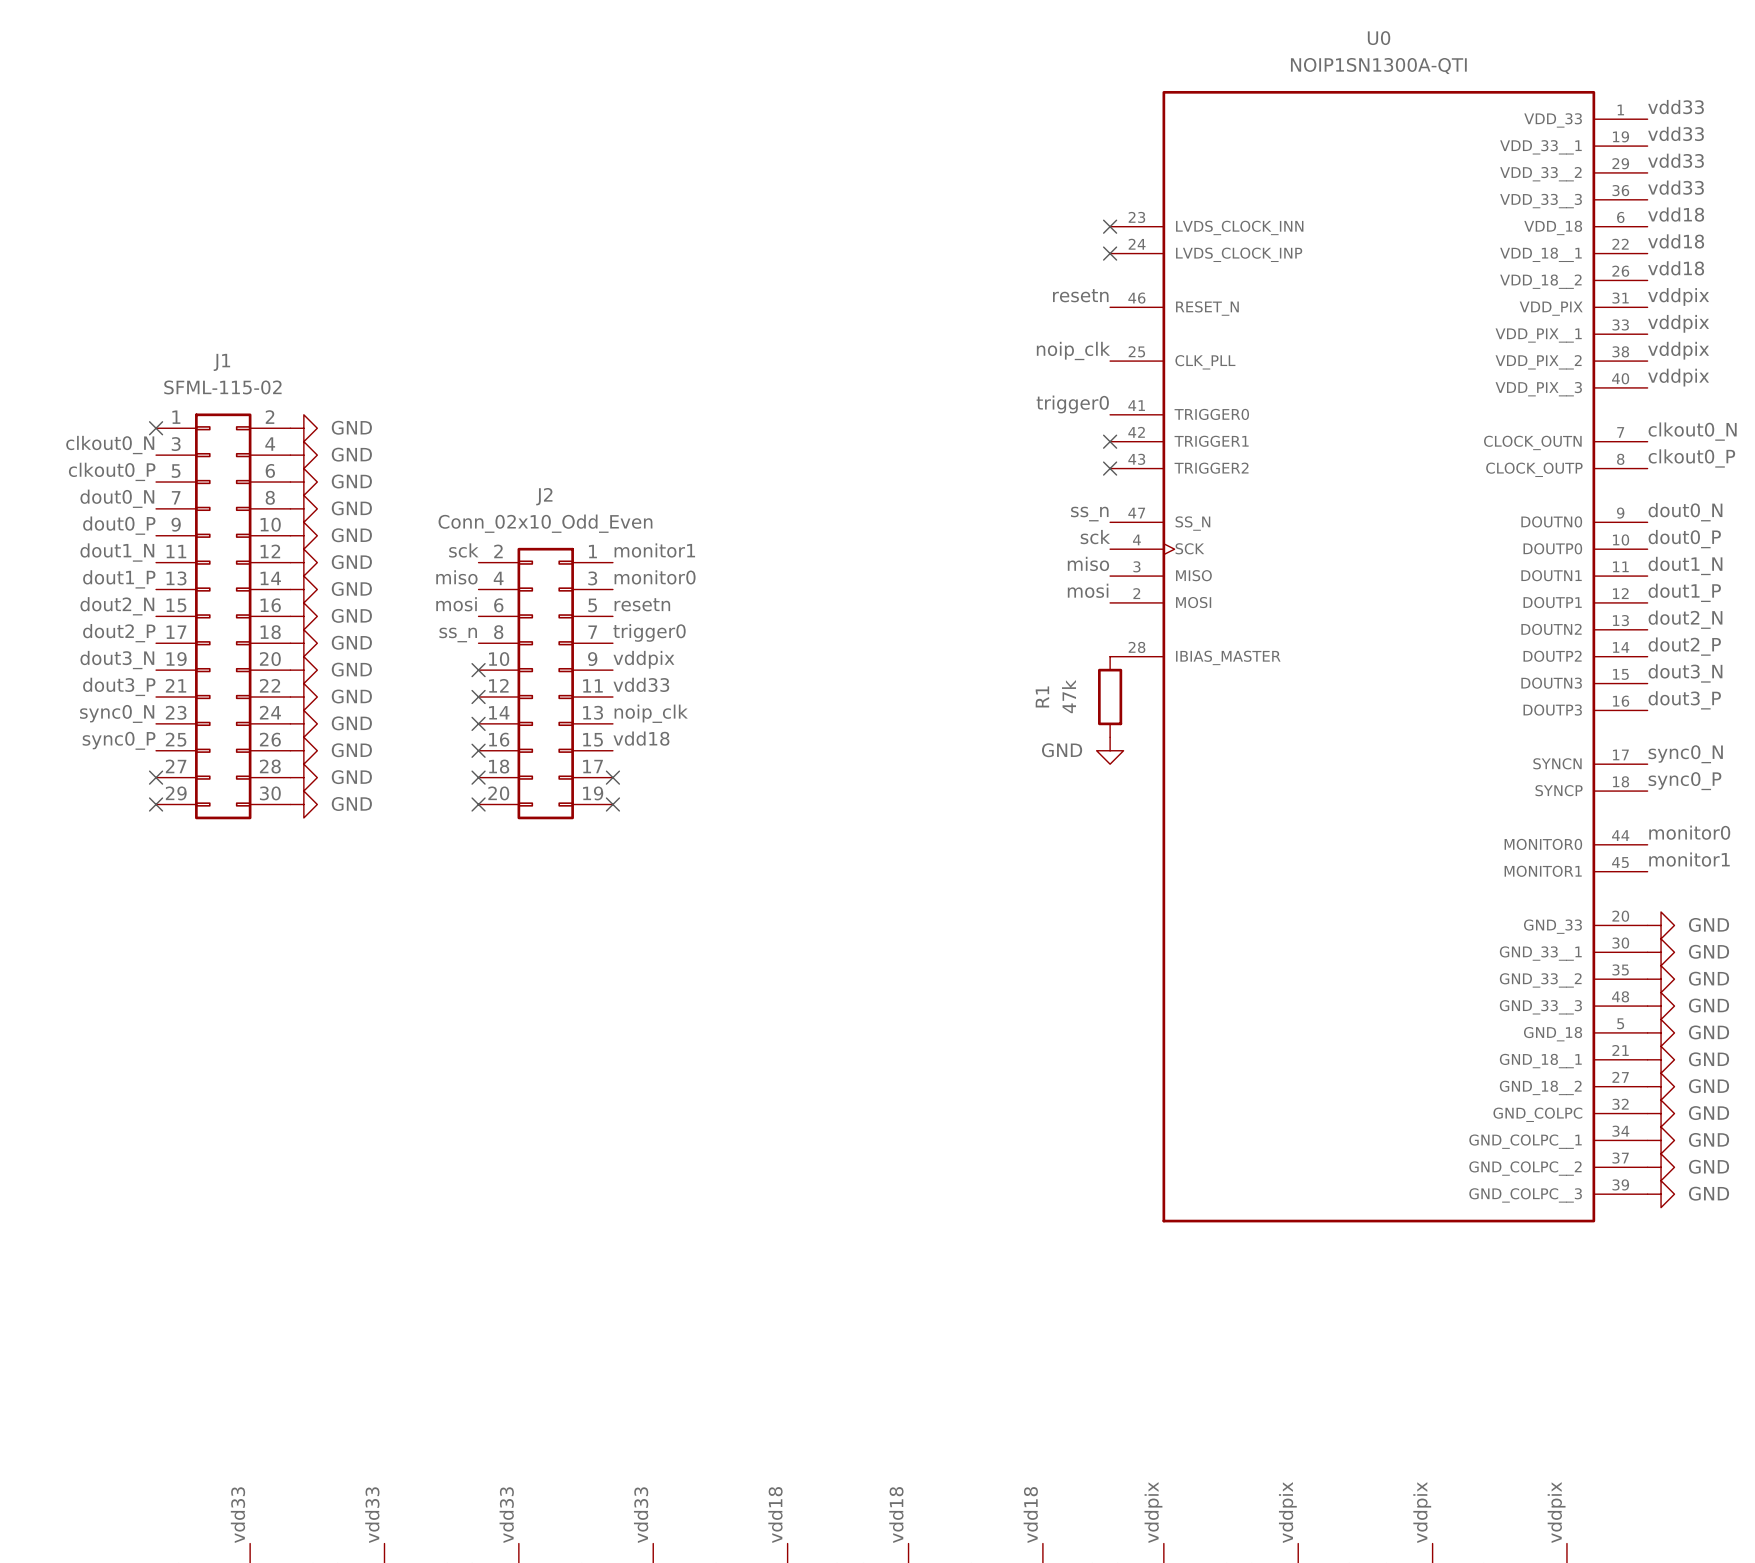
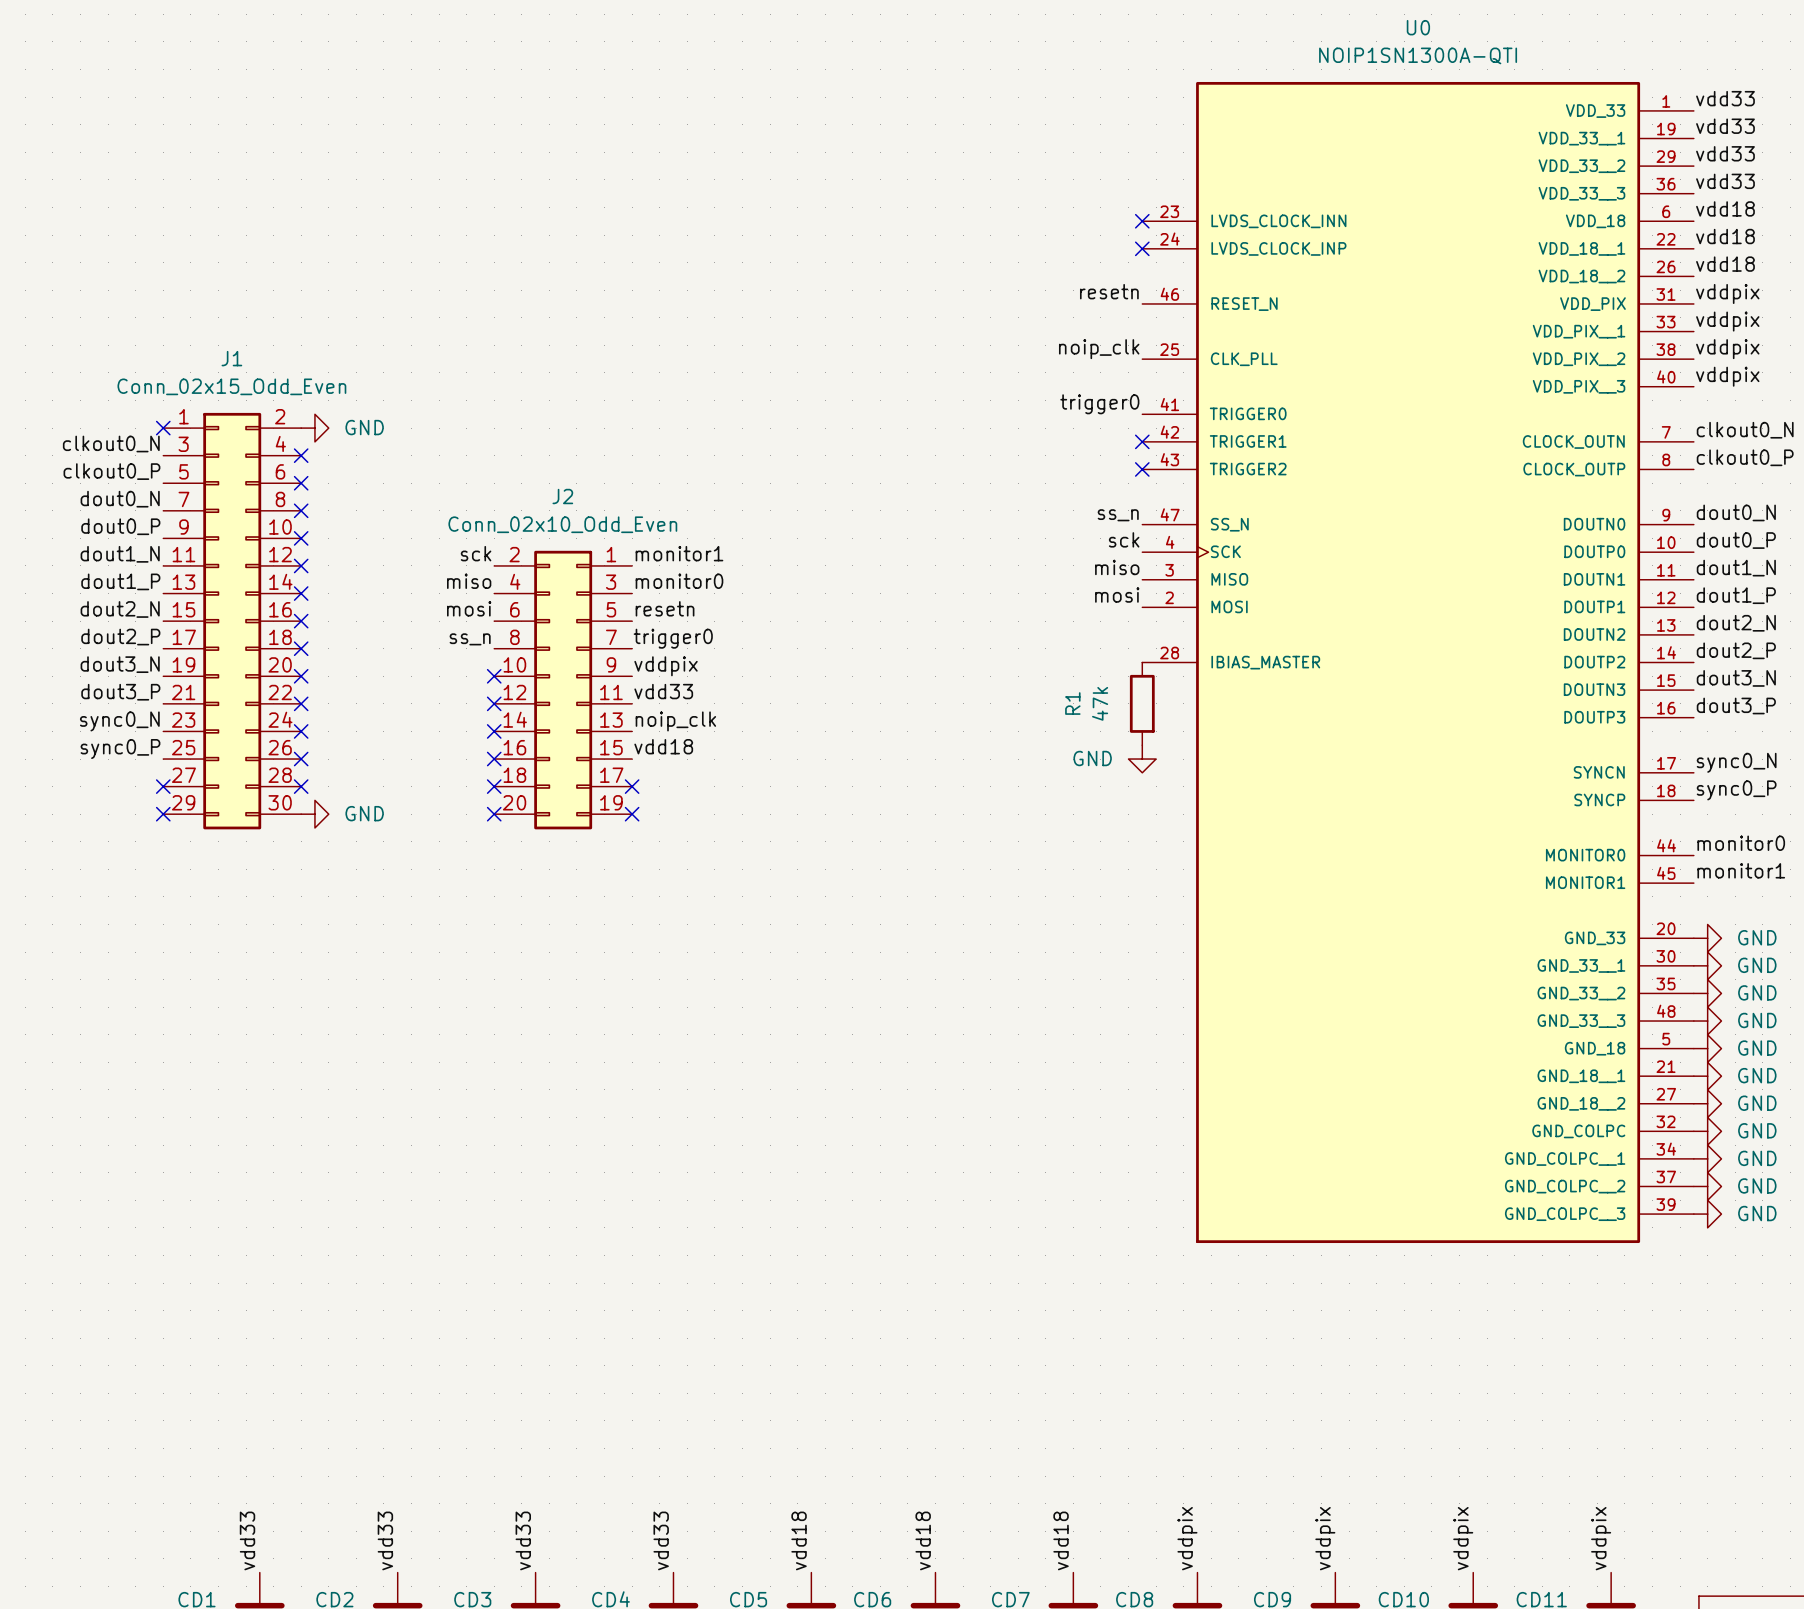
J1 value: SFML-115-02 (222, 387) -> Conn_02x15_Odd_Even (231, 386)
no-connect mark: none -> (301, 455)
power symbol: GND (303, 455) -> none
no-connect mark: none -> (301, 483)
power symbol: GND (303, 482) -> none
no-connect mark: none -> (301, 510)
power symbol: GND (303, 508) -> none
no-connect mark: none -> (301, 538)
power symbol: GND (303, 535) -> none
no-connect mark: none -> (301, 565)
power symbol: GND (303, 562) -> none
no-connect mark: none -> (301, 593)
power symbol: GND (303, 589) -> none
no-connect mark: none -> (301, 621)
power symbol: GND (303, 616) -> none
no-connect mark: none -> (301, 648)
power symbol: GND (303, 643) -> none
no-connect mark: none -> (301, 676)
power symbol: GND (303, 670) -> none
no-connect mark: none -> (301, 703)
power symbol: GND (303, 697) -> none
no-connect mark: none -> (301, 731)
power symbol: GND (303, 723) -> none
no-connect mark: none -> (301, 759)
power symbol: GND (303, 750) -> none
no-connect mark: none -> (301, 786)
power symbol: GND (303, 777) -> none

